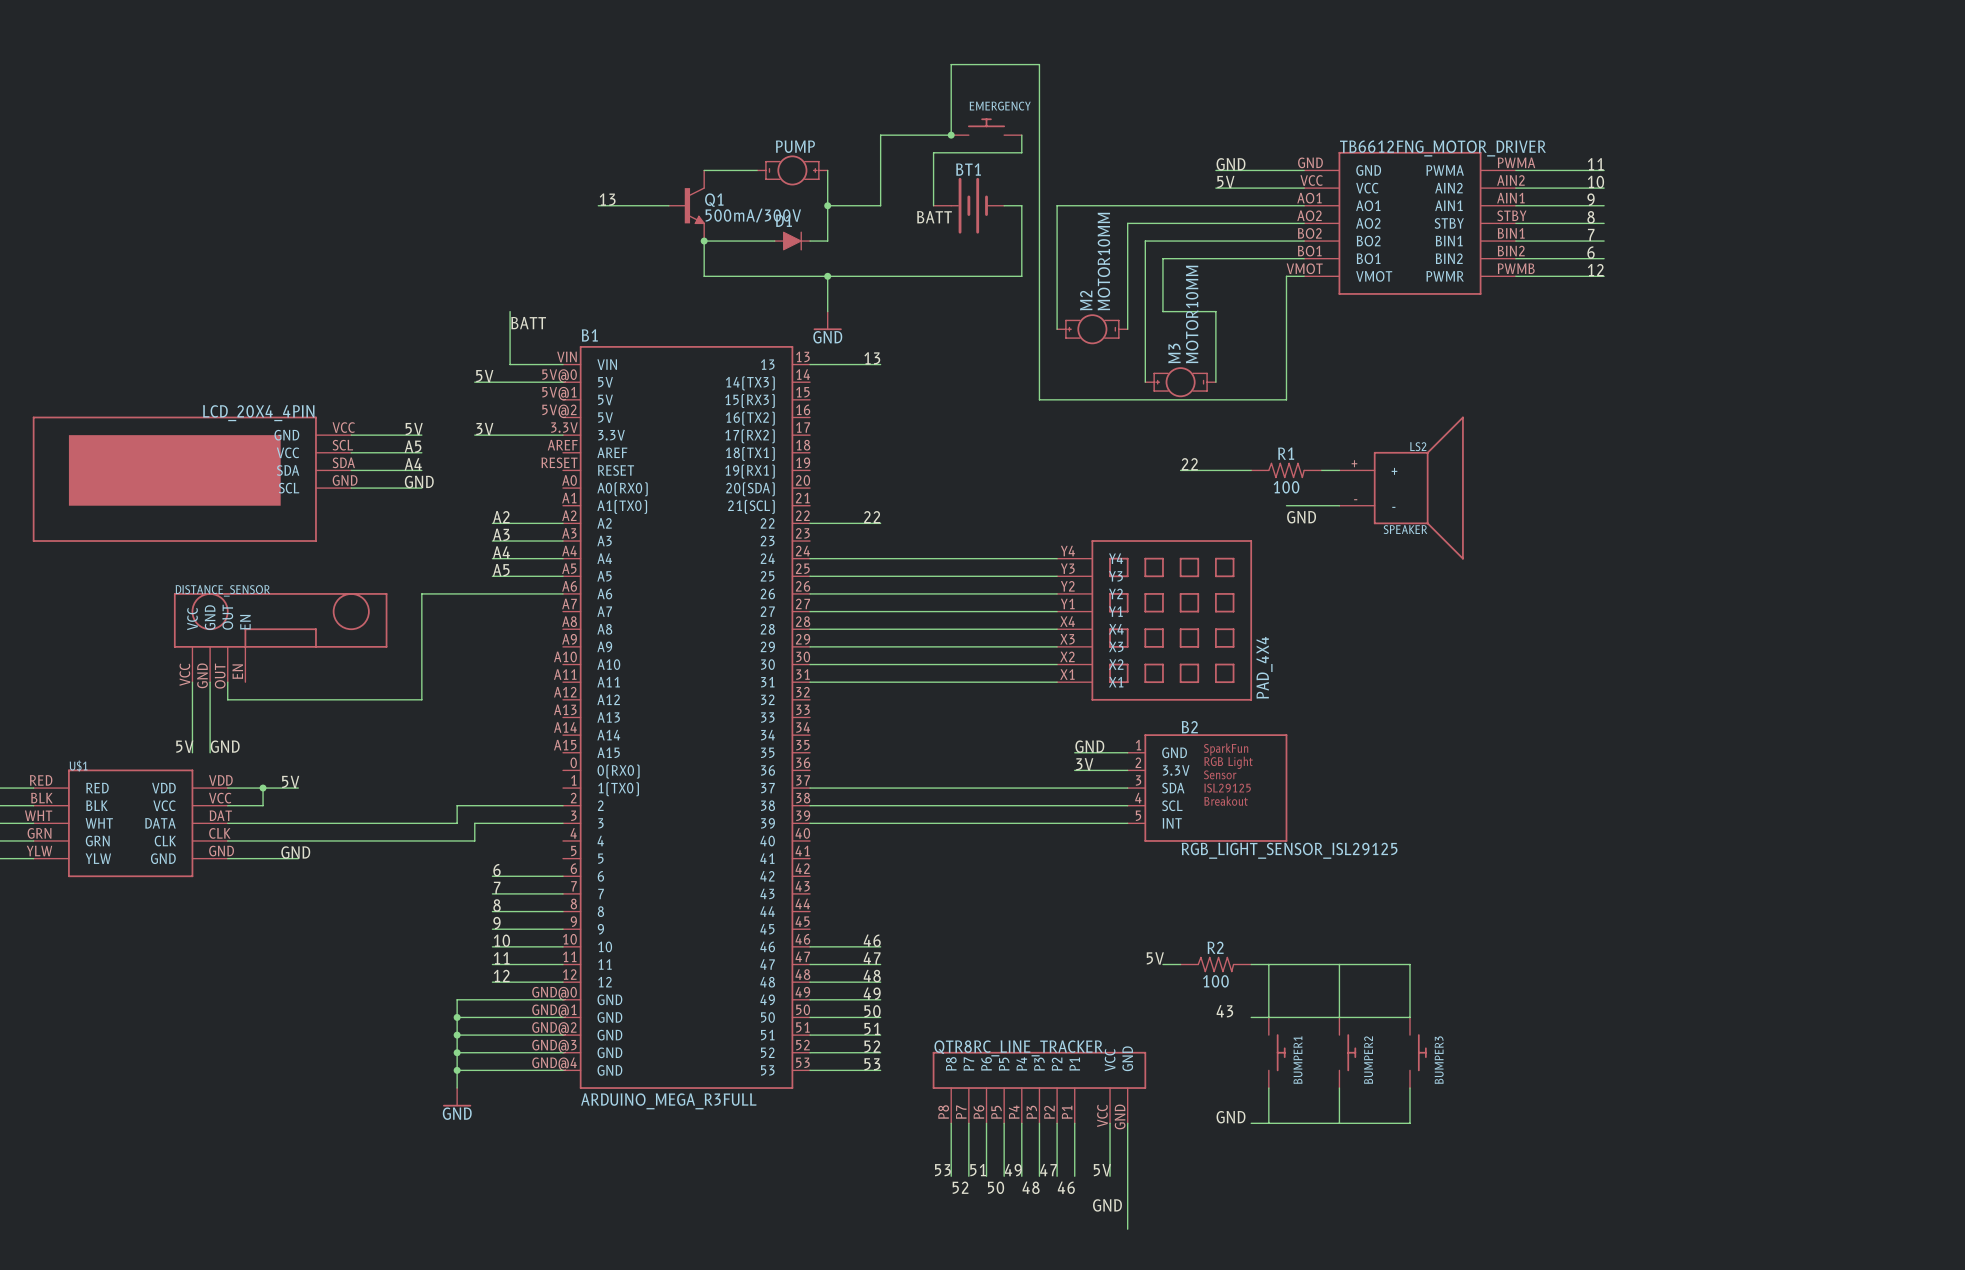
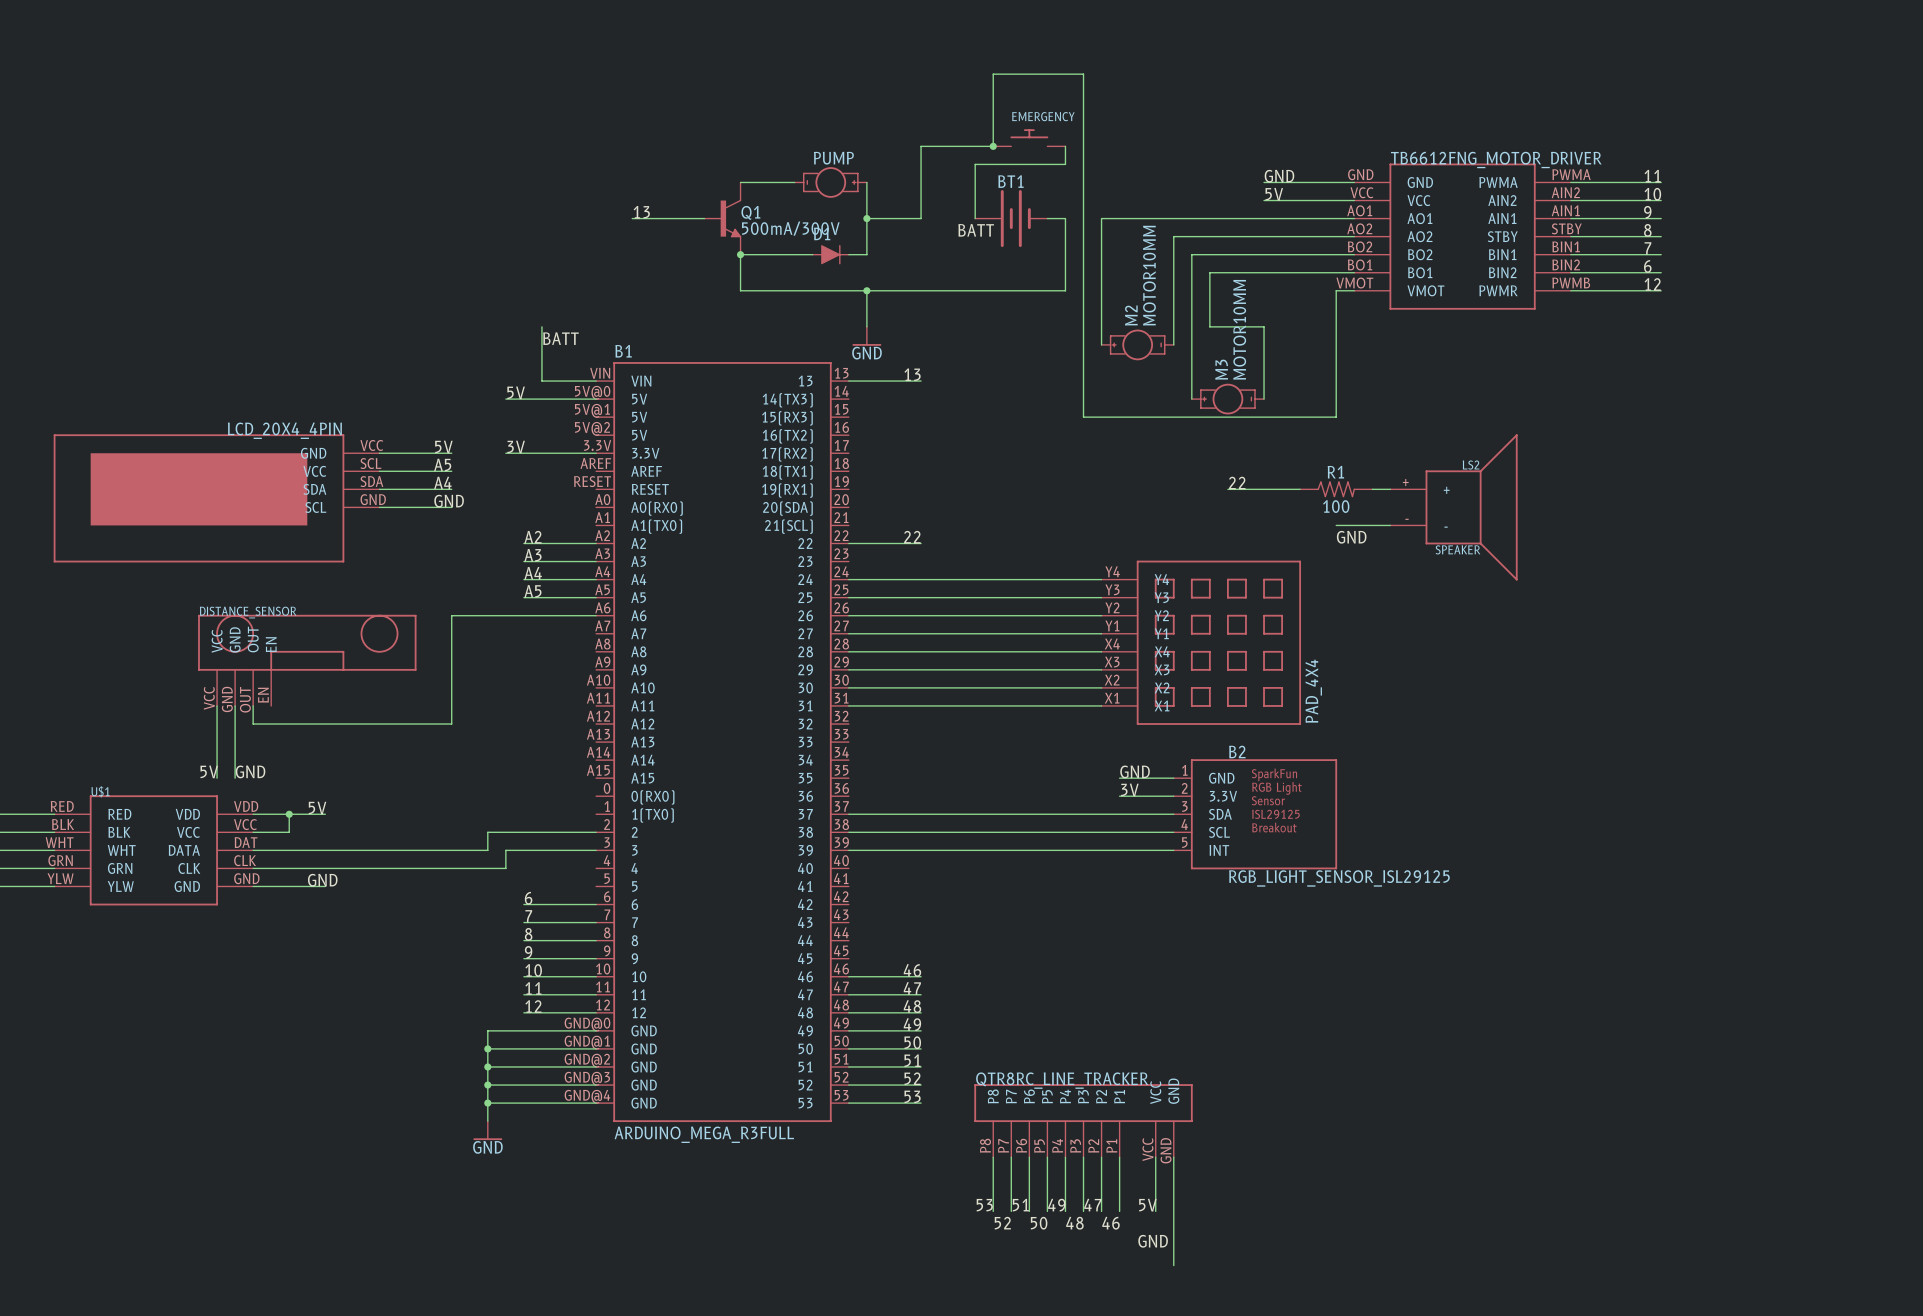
label: 5V (1155, 958) -> none
wire: (1162, 964) (1180, 964) -> none
R2: 100 (1215, 964) -> none
wire: (1251, 964) (1410, 964) (1410, 1017) (1251, 1017) -> none
wire: (1268, 964) (1268, 1017) -> none
wire: (1339, 964) (1339, 1017) -> none
label: 43 (1224, 1011) -> none
BUMPER1: (1277, 1052) -> none
BUMPER2: (1347, 1052) -> none
BUMPER3: (1418, 1052) -> none
wire: (1268, 1088) (1268, 1123) -> none
wire: (1339, 1088) (1339, 1123) -> none
wire: (1410, 1088) (1410, 1123) (1251, 1123) -> none
label: GND (1230, 1117) -> none

